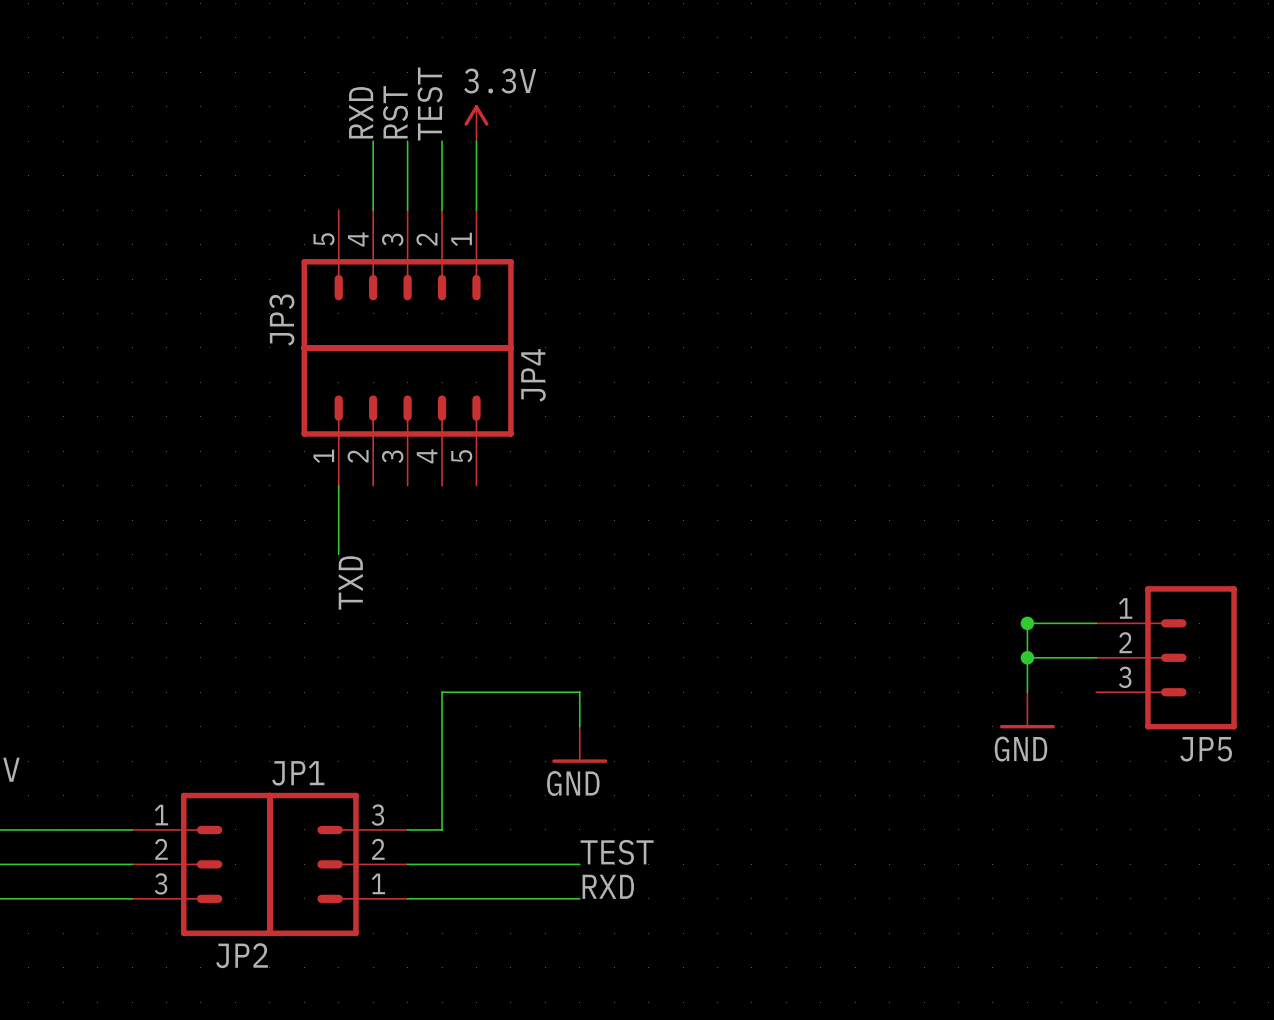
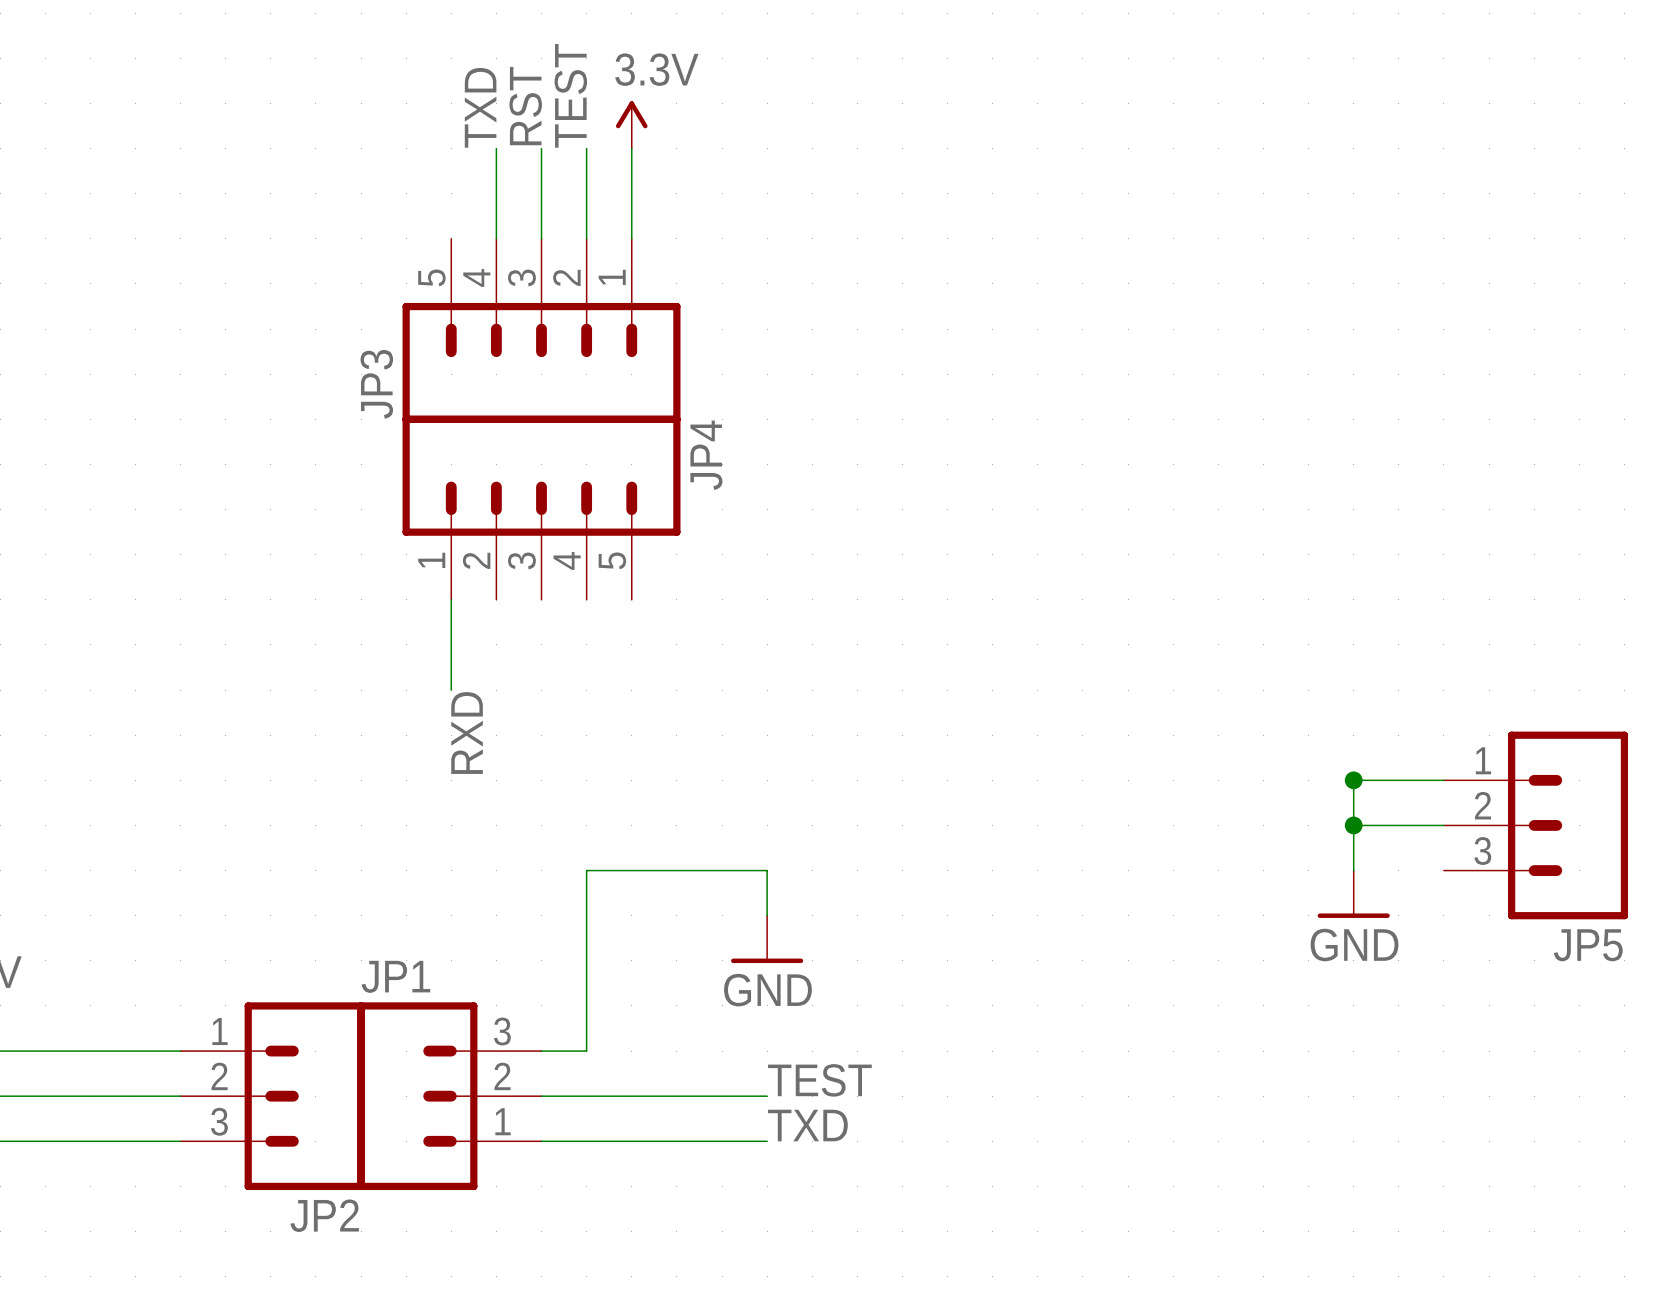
label: RXD (361, 112) -> TXD (480, 107)
label: TXD (350, 582) -> RXD (467, 733)
label: RXD (608, 886) -> TXD (807, 1125)

